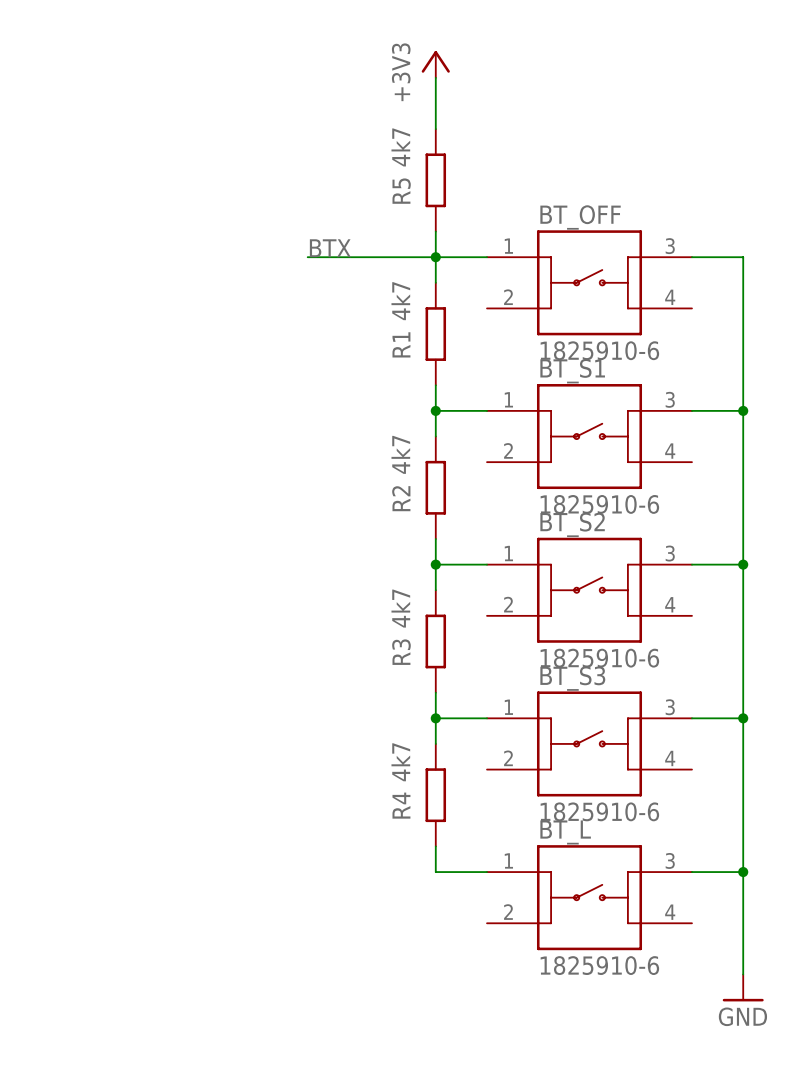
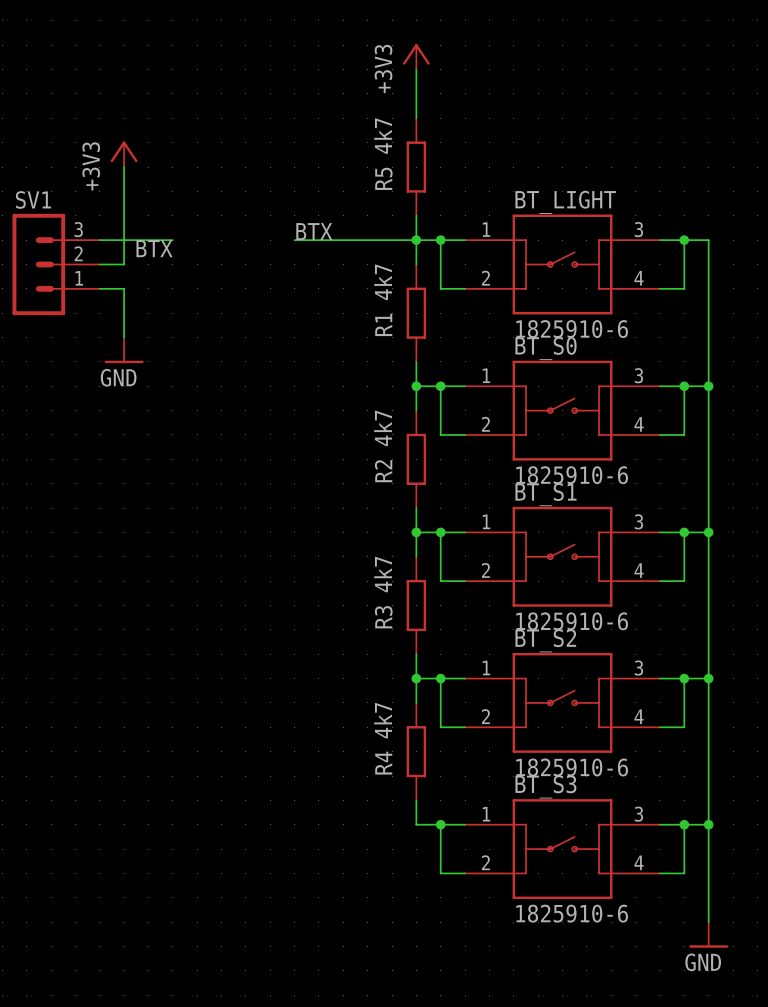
power symbol: none -> +3V3 (124, 154)
wire: none -> (124, 167) (124, 264) (99, 264)
BT_OFF name: BT_OFF (580, 217) -> BT_LIGHT (565, 202)
wire: none -> (99, 240) (172, 240)
wire: none -> (440, 240) (440, 288) (465, 288)
junction: none -> (440, 240)
wire: none -> (684, 240) (684, 288) (659, 288)
junction: none -> (684, 240)
label: none -> BTX (154, 248)
SV1: none -> (56, 264)
wire: none -> (99, 288) (124, 288) (124, 337)
BT_S1 name: BT_S1 (572, 371) -> BT_S0 (546, 348)
power symbol: none -> GND (124, 350)
wire: none -> (440, 386) (440, 434) (465, 434)
junction: none -> (440, 386)
wire: none -> (684, 386) (684, 434) (659, 434)
junction: none -> (684, 386)
BT_S2 name: BT_S2 (572, 524) -> BT_S1 (545, 494)
wire: none -> (440, 532) (440, 581) (465, 581)
junction: none -> (440, 532)
wire: none -> (684, 532) (684, 581) (659, 581)
junction: none -> (684, 532)
BT_S3 name: BT_S3 (572, 678) -> BT_S2 (545, 640)
wire: none -> (440, 678) (440, 727) (465, 727)
junction: none -> (440, 678)
wire: none -> (684, 678) (684, 727) (659, 727)
junction: none -> (684, 678)
BT_L name: BT_L (565, 832) -> BT_S3 (545, 786)
wire: none -> (440, 824) (440, 873) (465, 873)
junction: none -> (440, 824)
wire: none -> (684, 824) (684, 873) (659, 873)
junction: none -> (684, 824)

